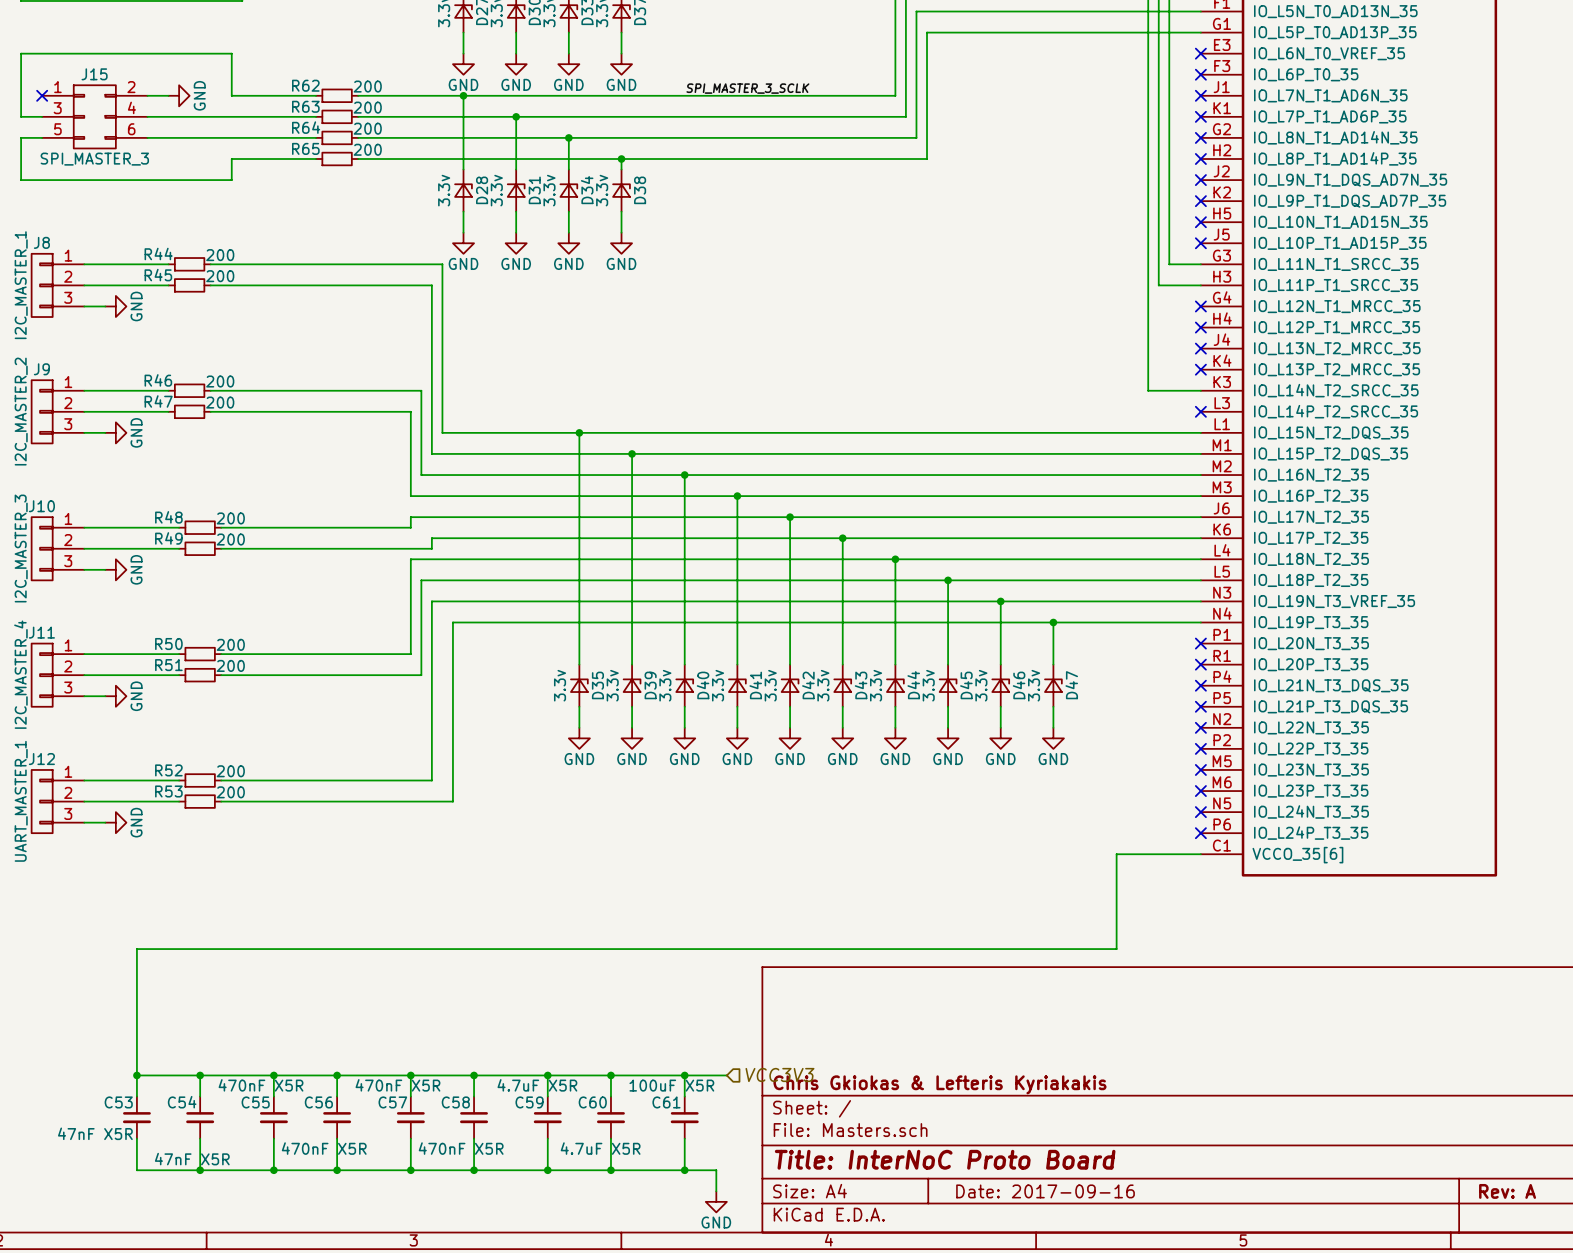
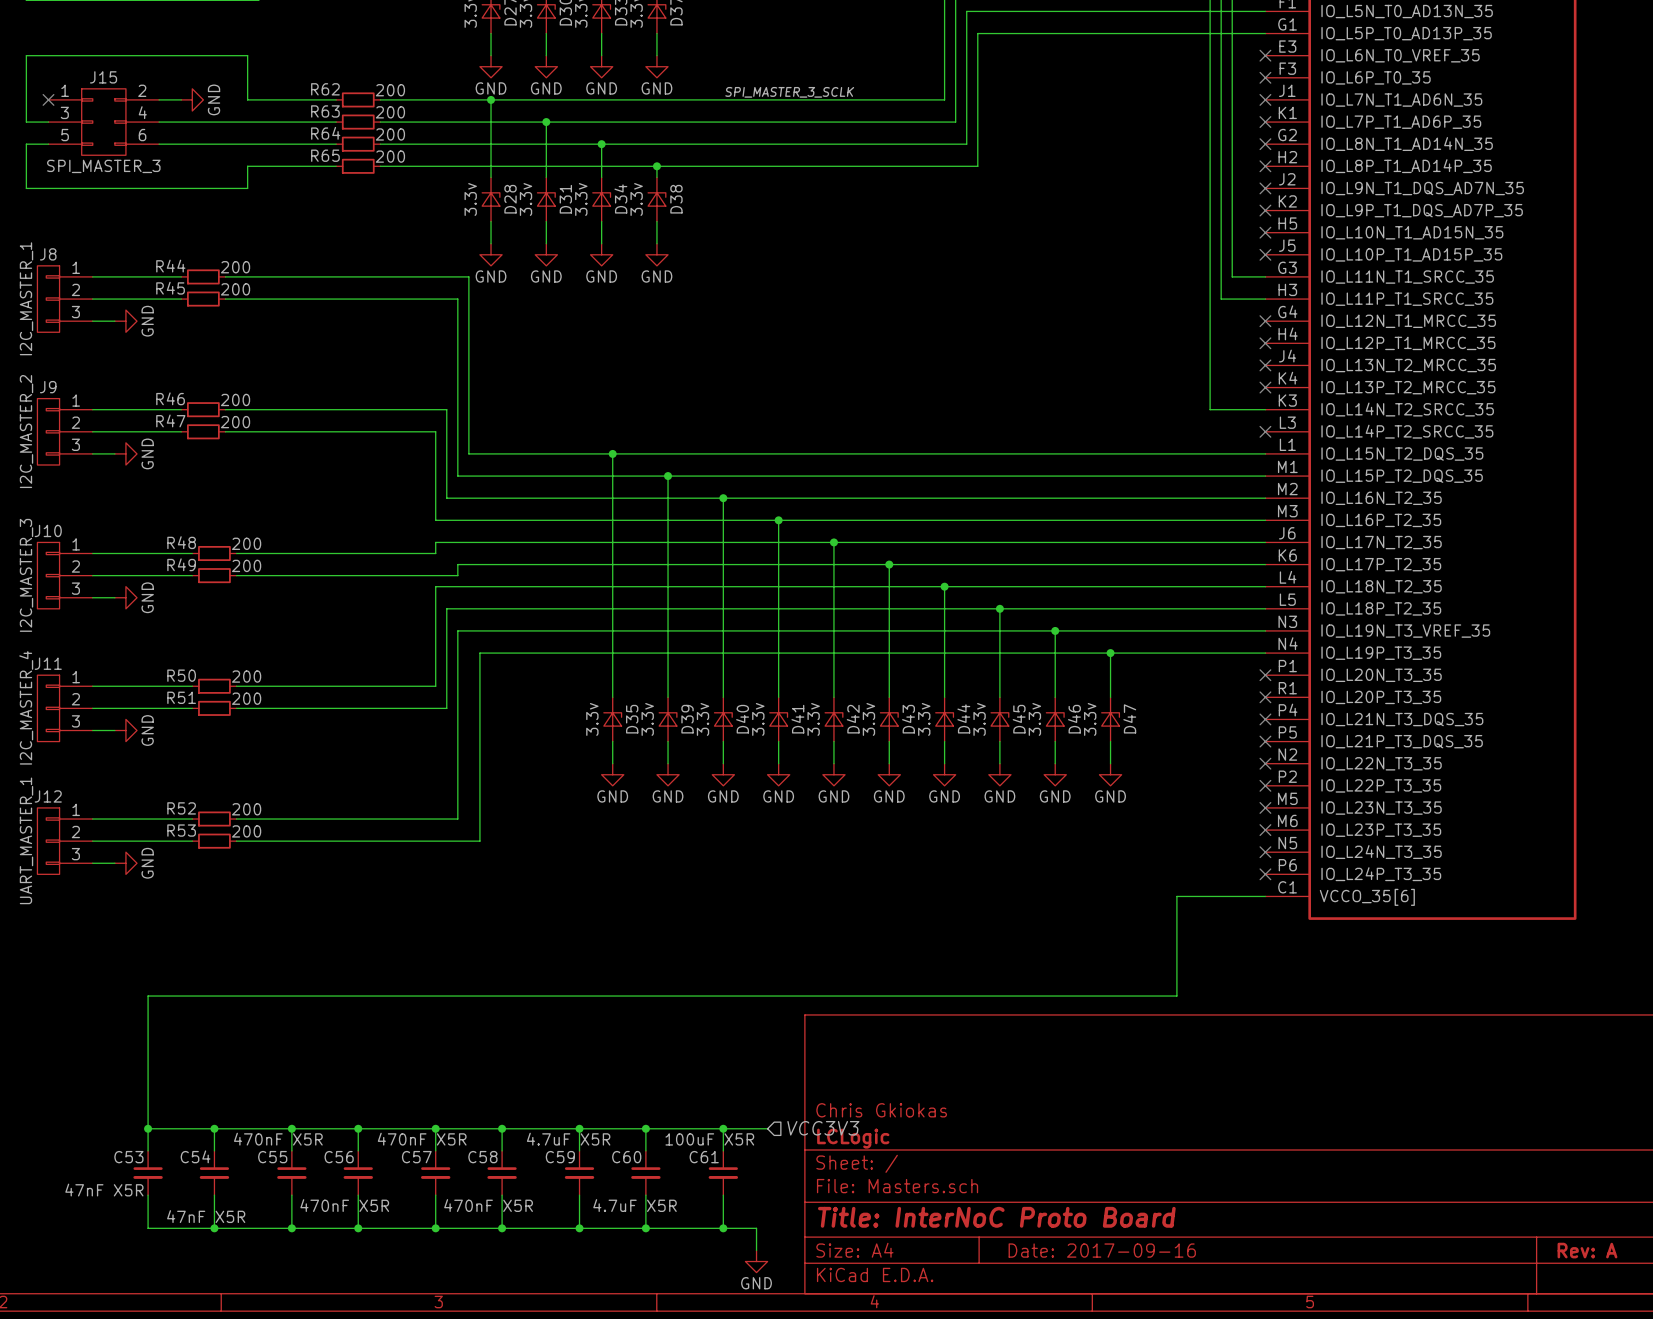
title block: none -> Chris Gkiokas (881, 1110)
title block: Chris Gkiokas & Lefteris Kyriakakis (939, 1084) -> LCLogic (853, 1138)

